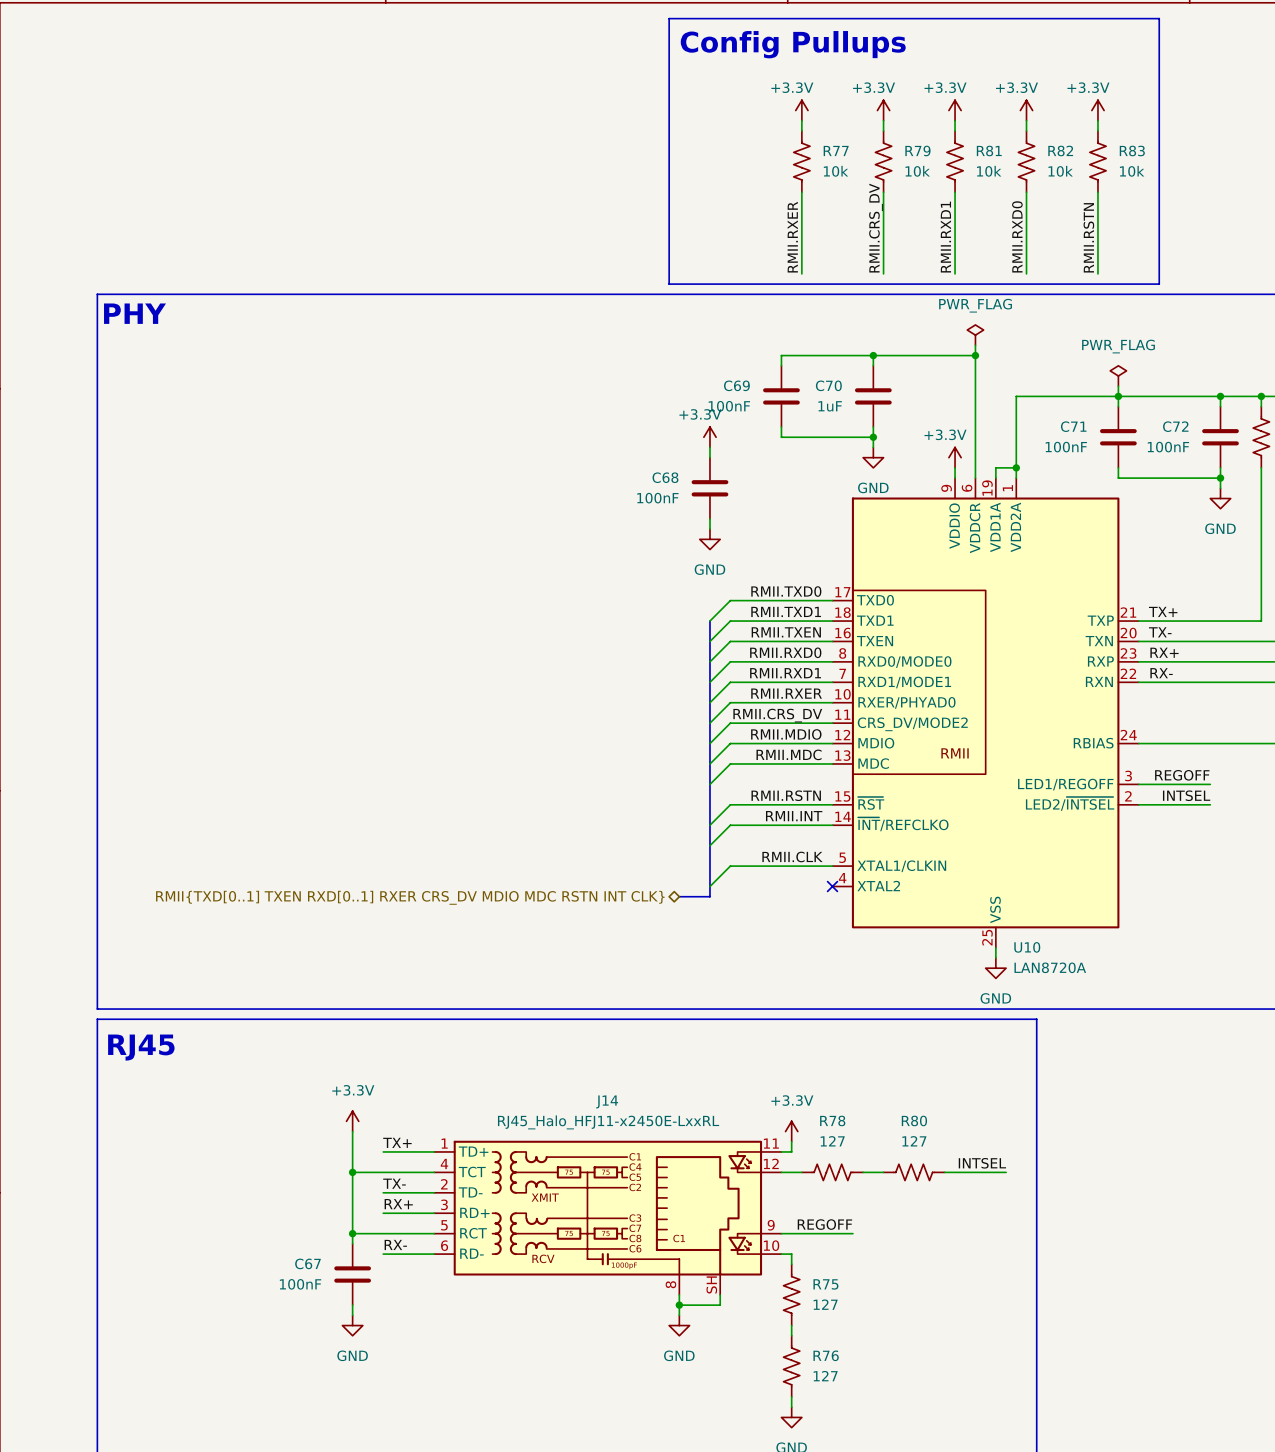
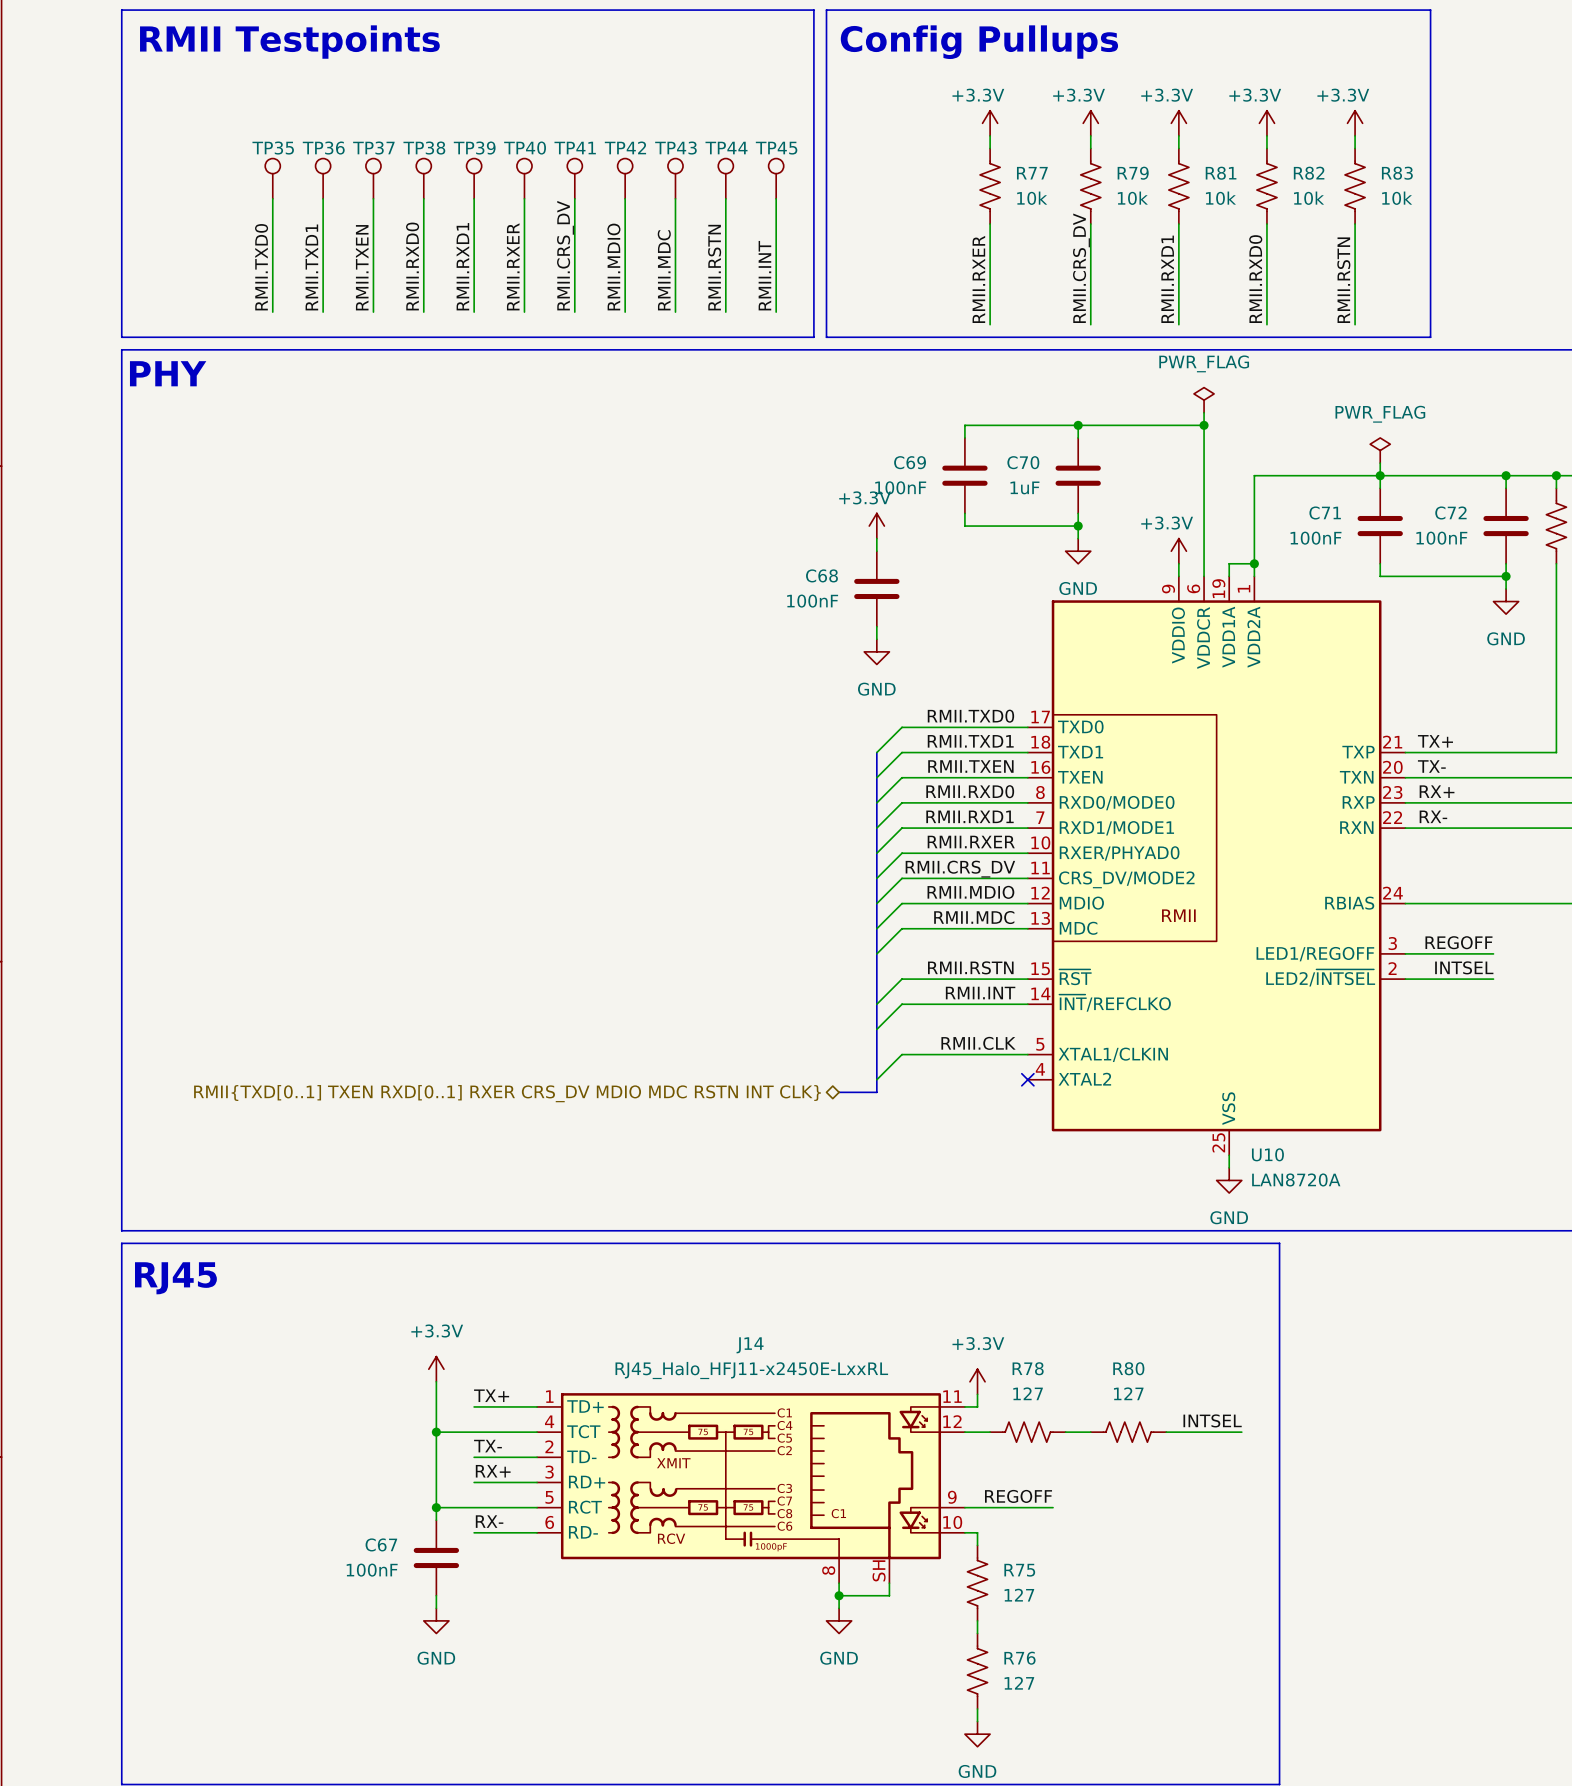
line: none -> (121, 10) (813, 10) (813, 337) (121, 337) (121, 10)
text: none -> RMII Testpoints (289, 42)
TP35: none -> (272, 178)
TP36: none -> (323, 178)
TP37: none -> (373, 178)
TP38: none -> (423, 178)
TP39: none -> (474, 178)
TP40: none -> (524, 178)
TP41: none -> (574, 178)
TP42: none -> (625, 178)
TP43: none -> (675, 178)
TP44: none -> (725, 178)
TP45: none -> (776, 178)
wire: none -> (272, 198) (272, 312)
wire: none -> (323, 198) (323, 312)
wire: none -> (373, 198) (373, 312)
wire: none -> (423, 198) (423, 312)
wire: none -> (474, 198) (474, 312)
wire: none -> (524, 198) (524, 312)
wire: none -> (574, 198) (574, 312)
wire: none -> (625, 198) (625, 312)
wire: none -> (675, 198) (675, 312)
wire: none -> (725, 198) (725, 312)
wire: none -> (776, 198) (776, 312)
label: none -> RMII.CRS_DV (565, 255)
label: none -> RMII.RXD0 (412, 266)
label: none -> RMII.RXD1 (462, 266)
label: none -> RMII.RXER (513, 266)
label: none -> RMII.TXD0 (261, 267)
label: none -> RMII.TXD1 (311, 267)
label: none -> RMII.TXEN (362, 267)
label: none -> RMII.MDIO (613, 267)
label: none -> RMII.RSTN (714, 267)
label: none -> RMII.MDC (664, 270)
label: none -> RMII.INT (764, 275)

